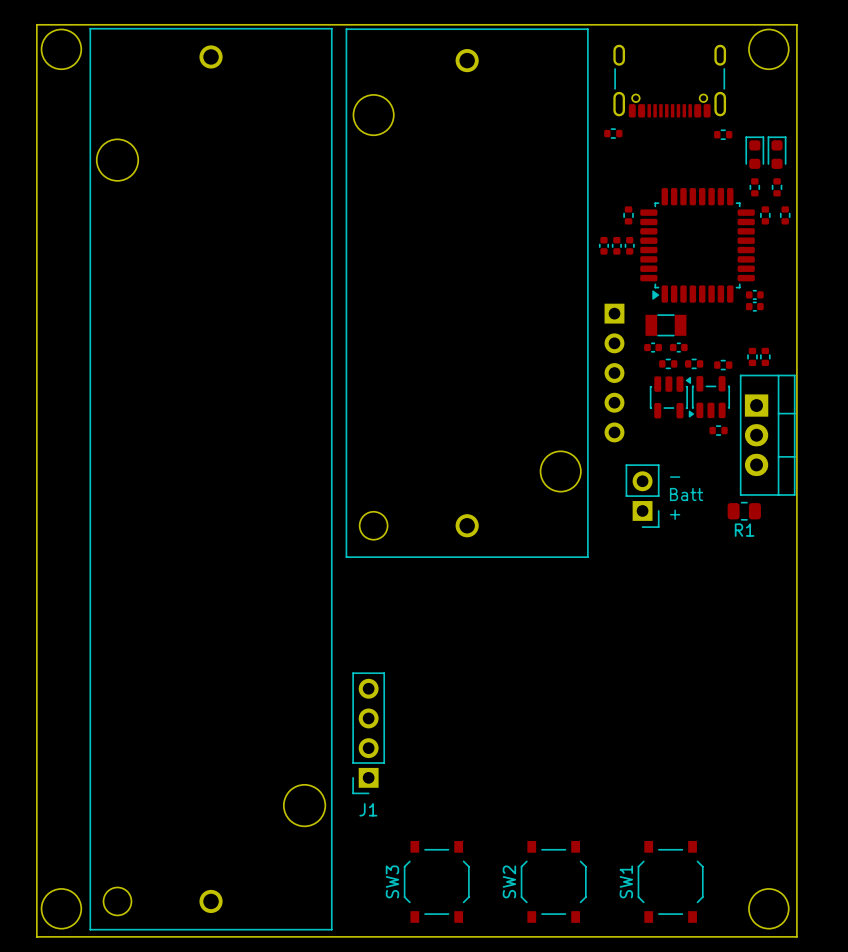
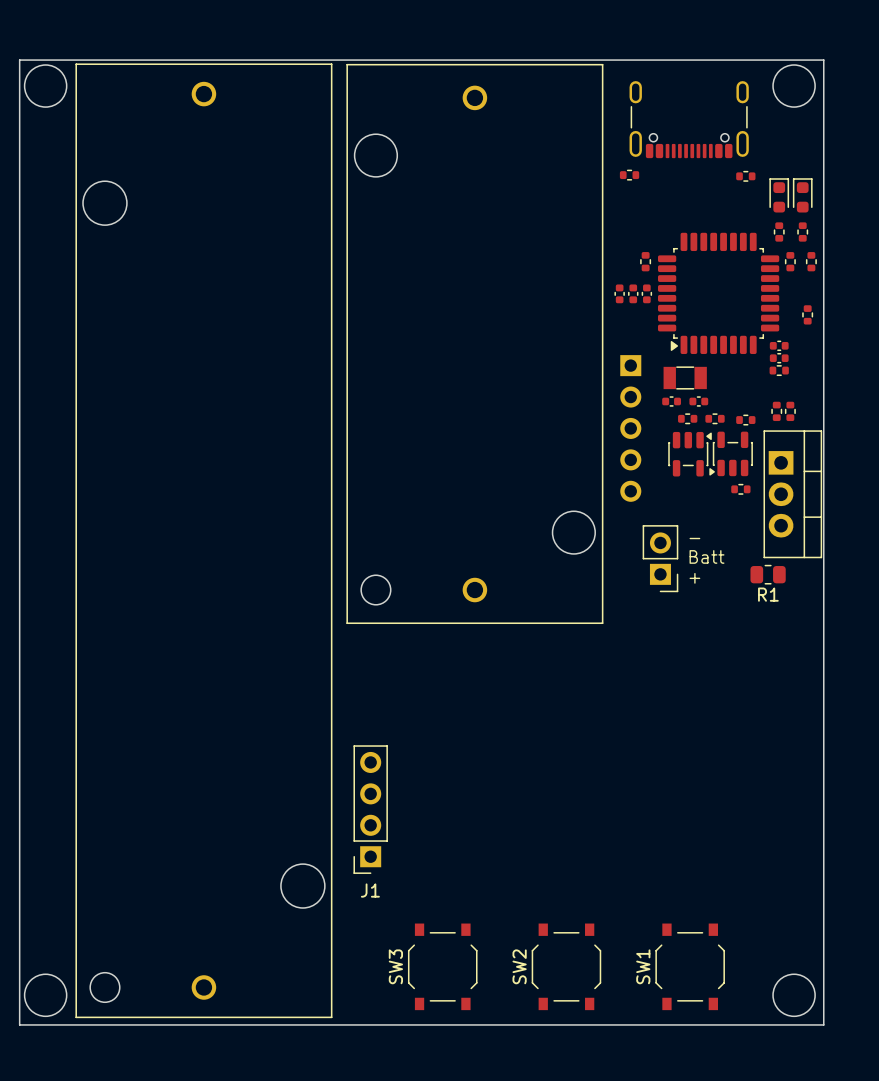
part: none -> (807, 314)
part: none -> (779, 370)

